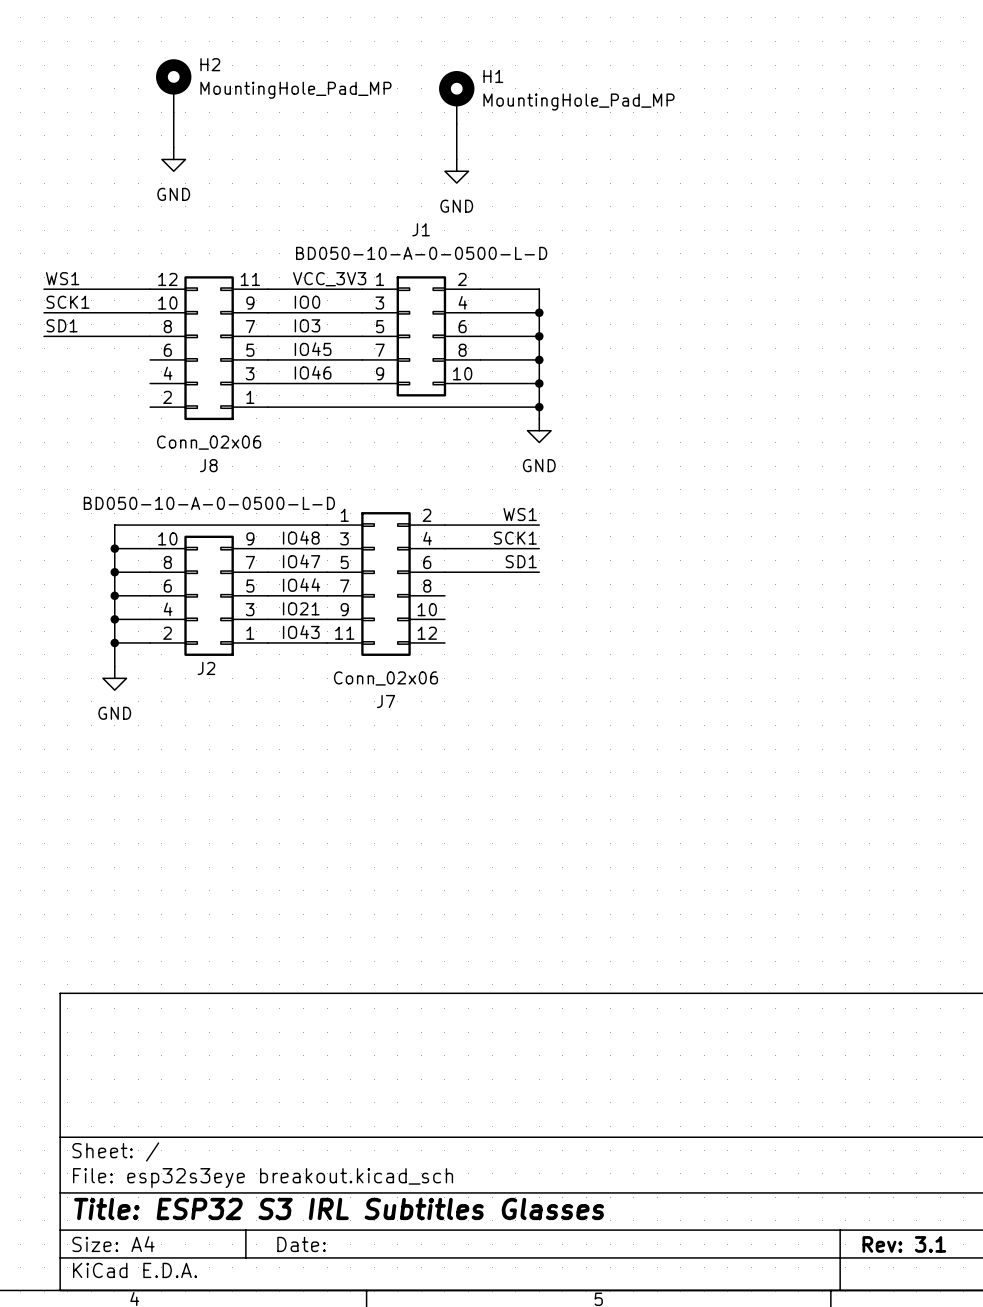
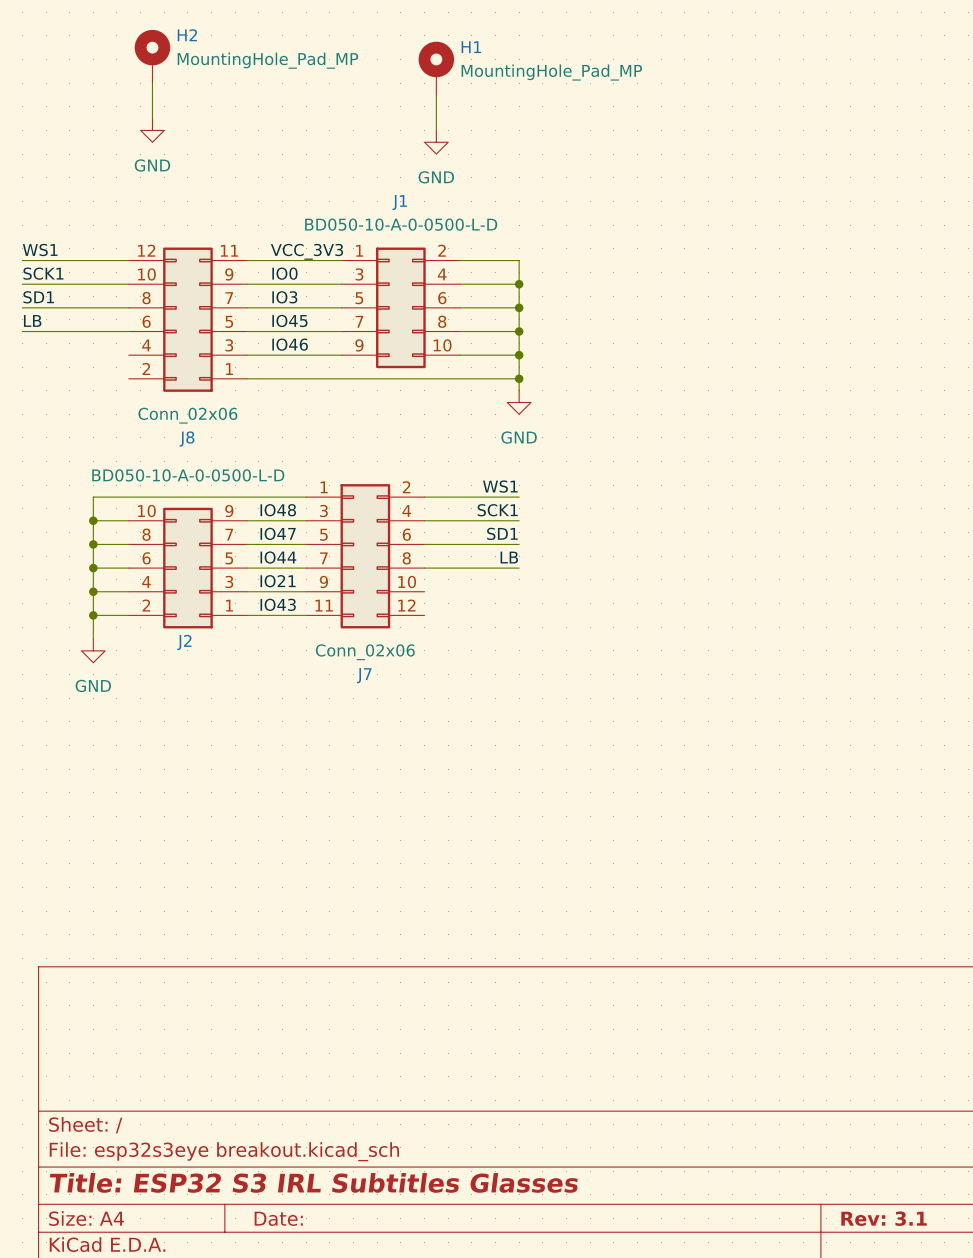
label: none -> LB (32, 320)
wire: none -> (22, 331) (128, 331)
label: none -> LB (509, 557)
wire: none -> (424, 568) (519, 568)

